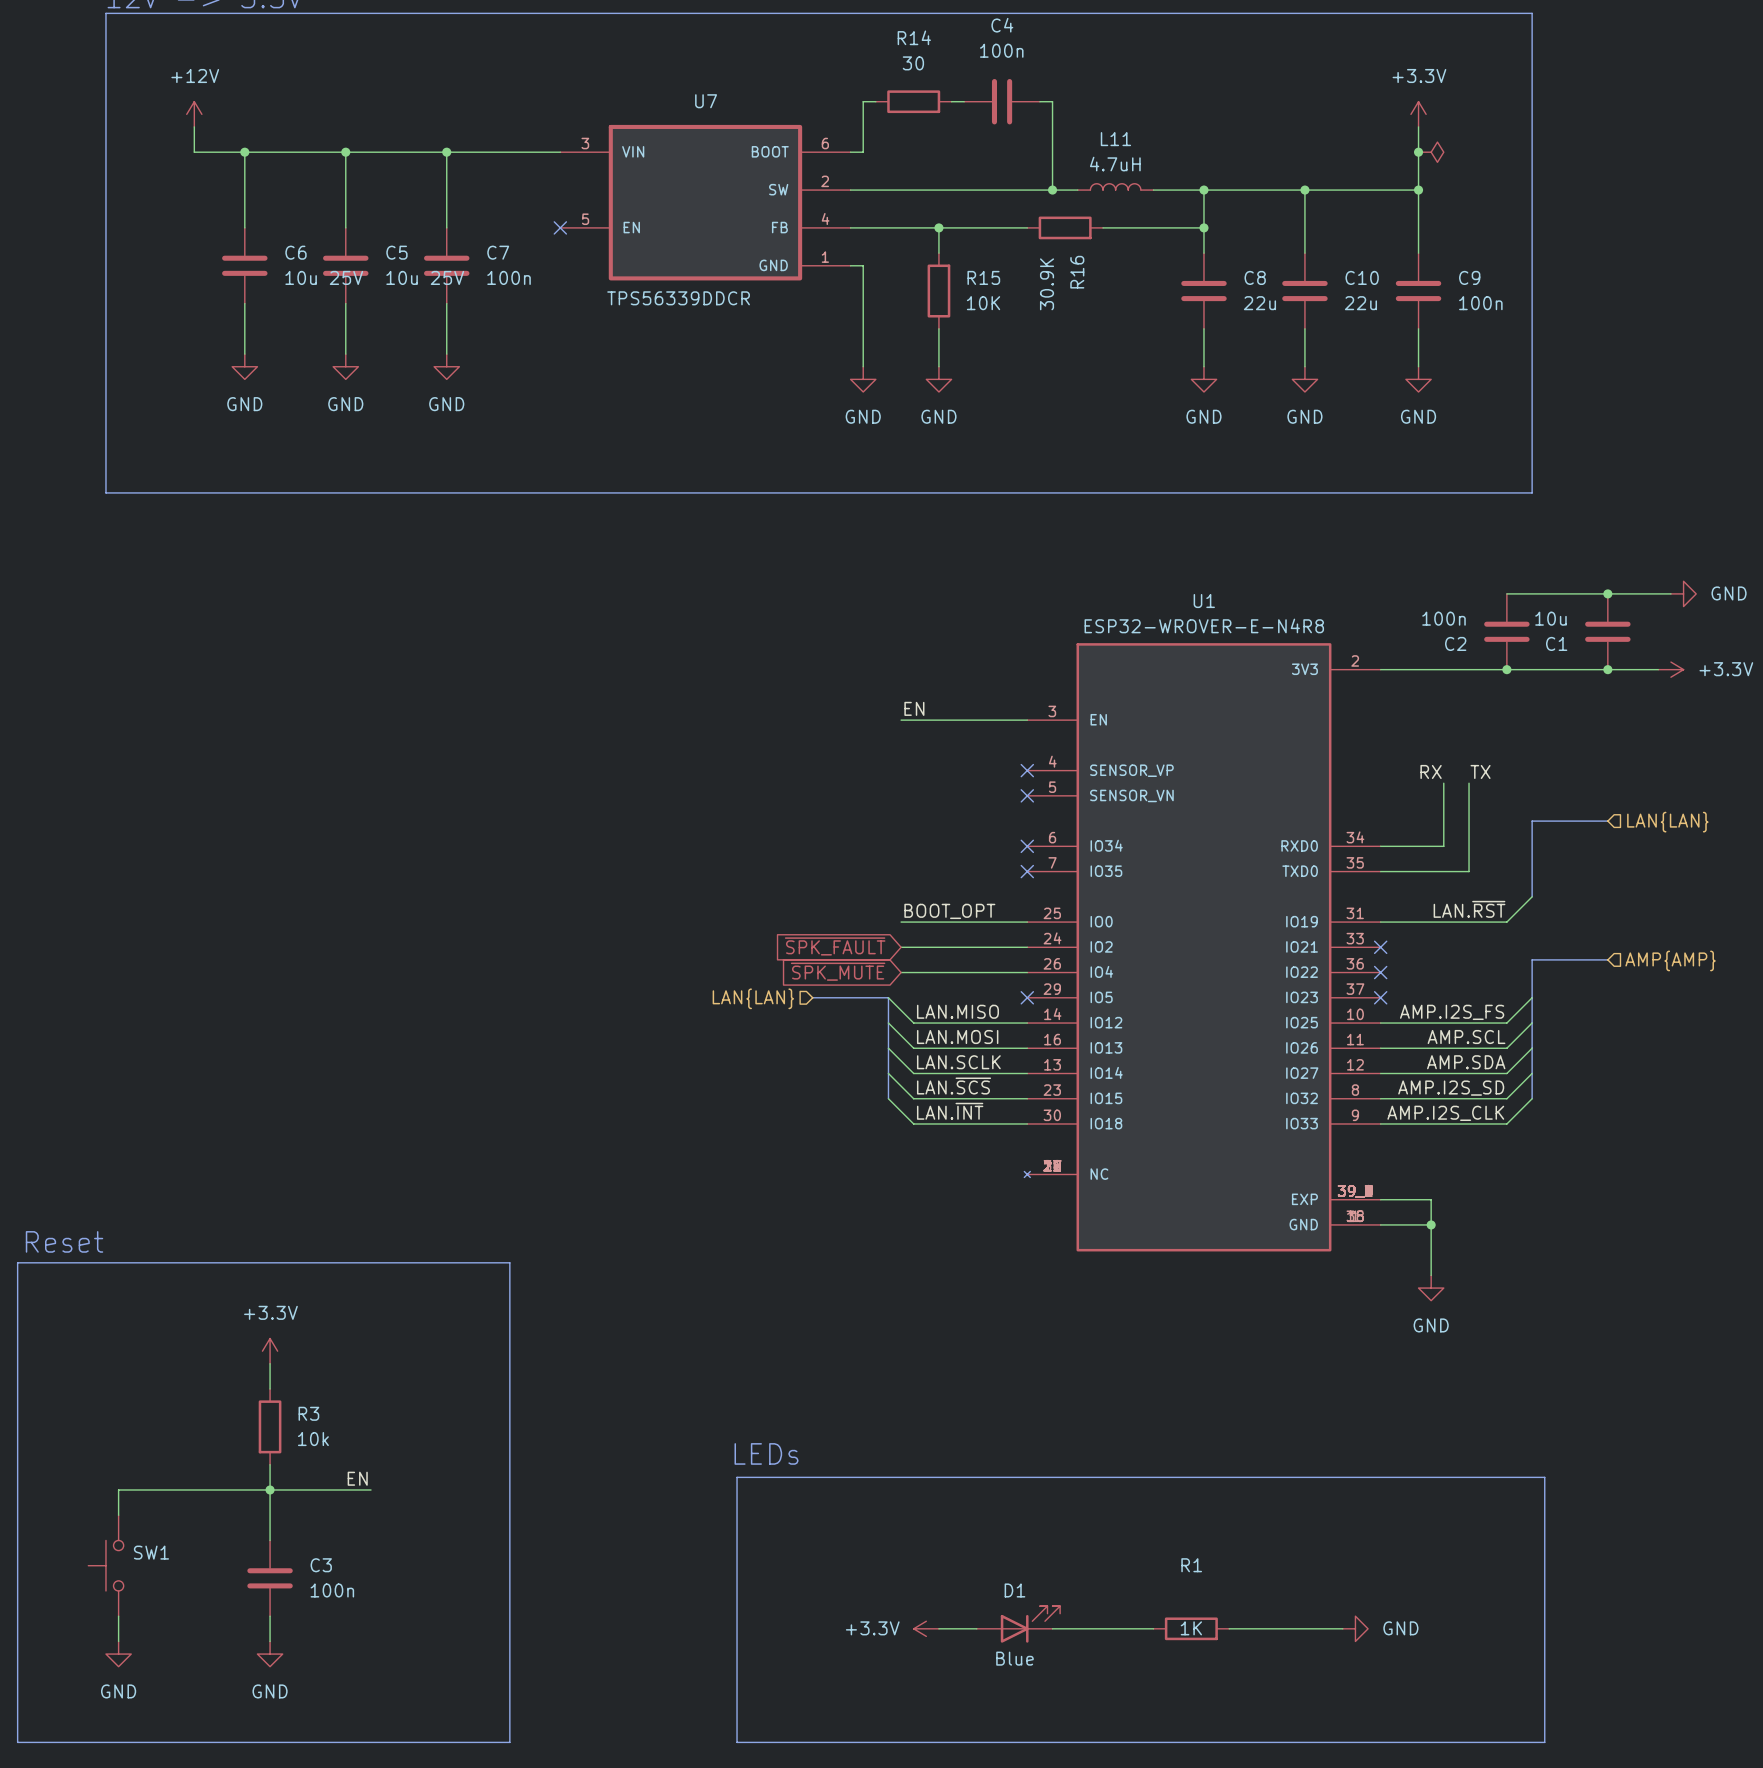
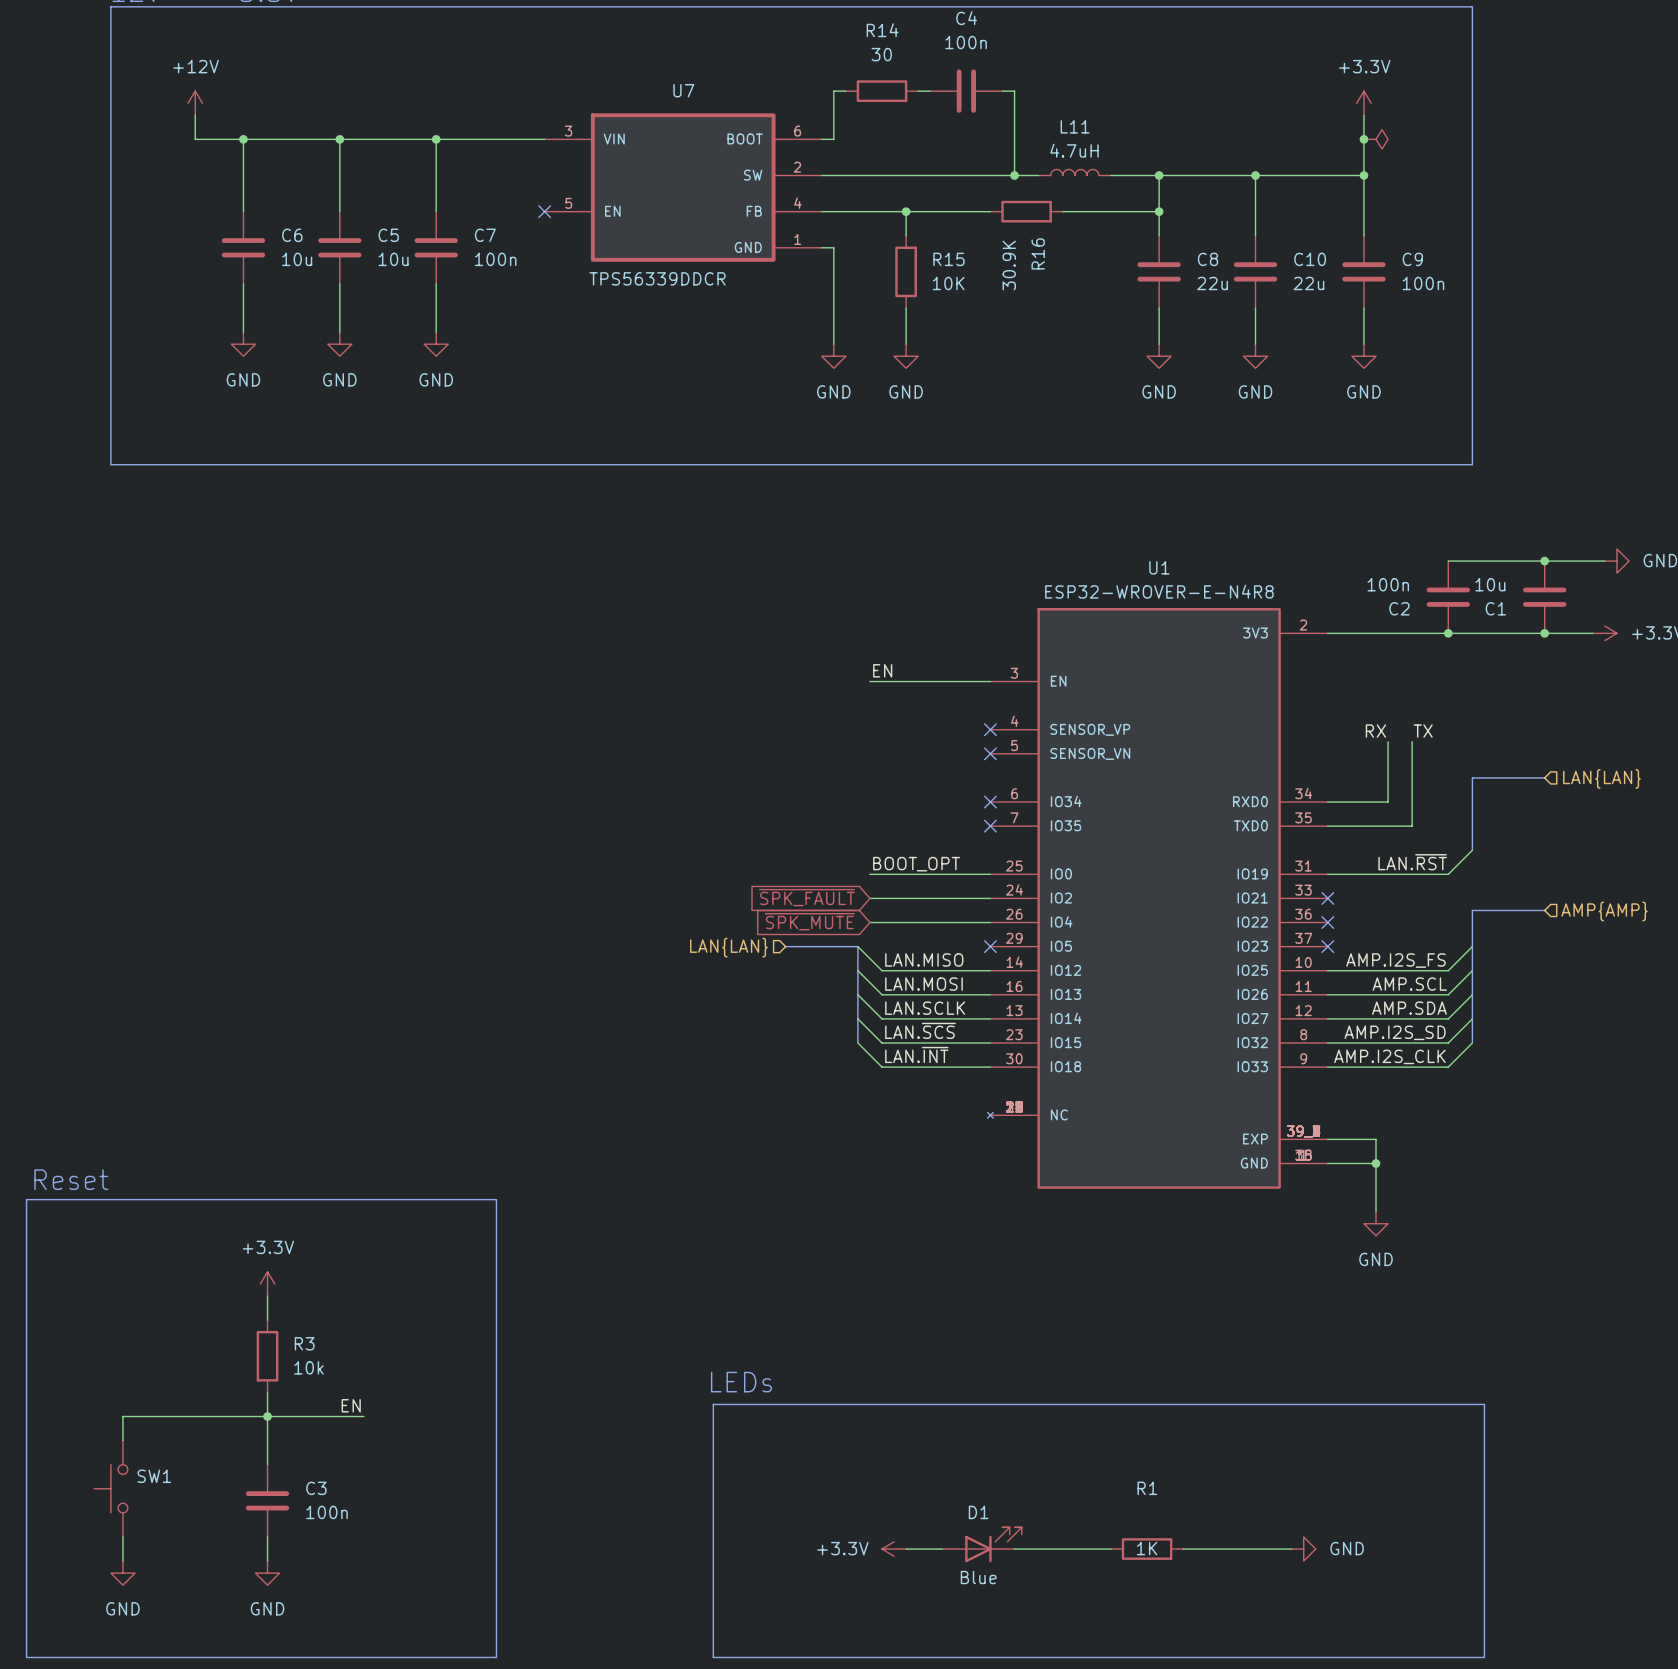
C6 value: 10u 25V (324, 277) -> 10u (297, 259)
C5 value: 10u 25V (425, 277) -> 10u (393, 259)

